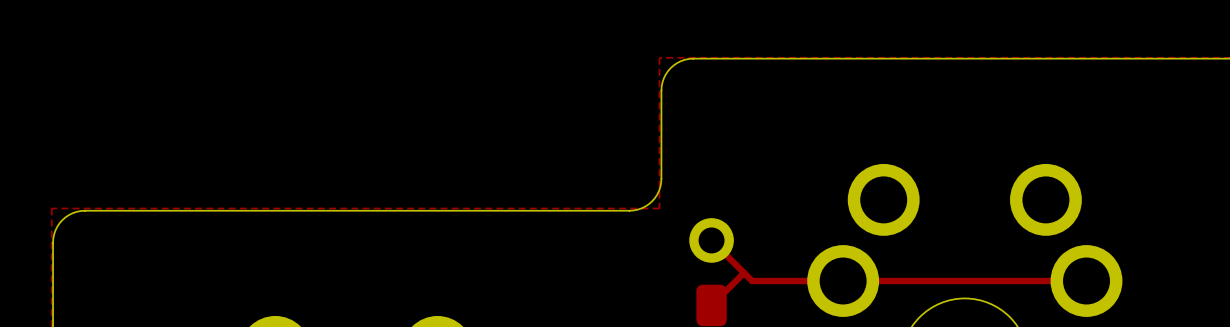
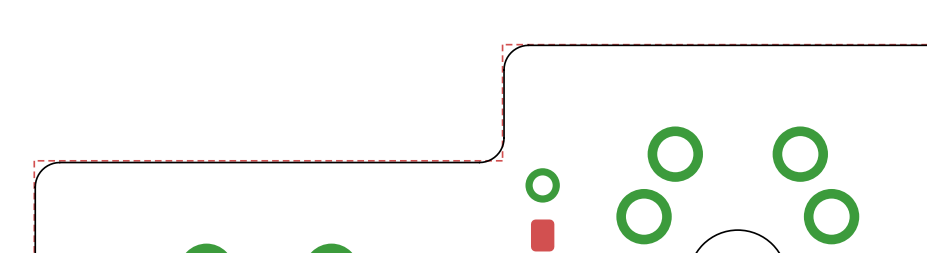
track: (711, 240) (752, 281) (1086, 281) -> none
track: (744, 272) (711, 305) -> none

